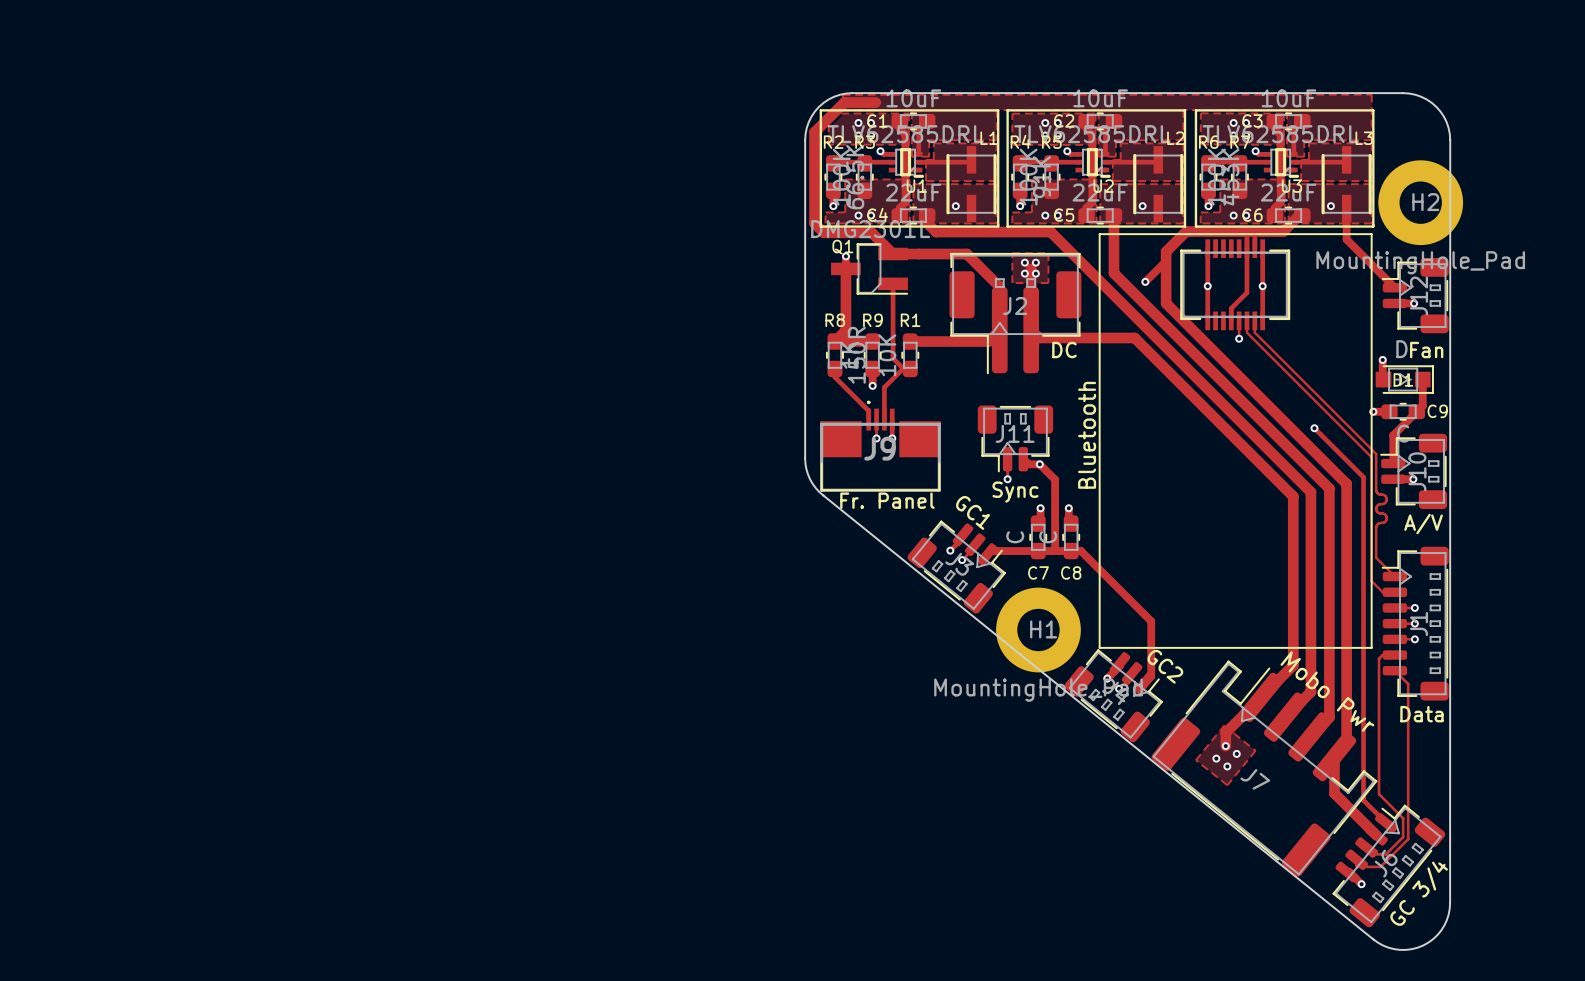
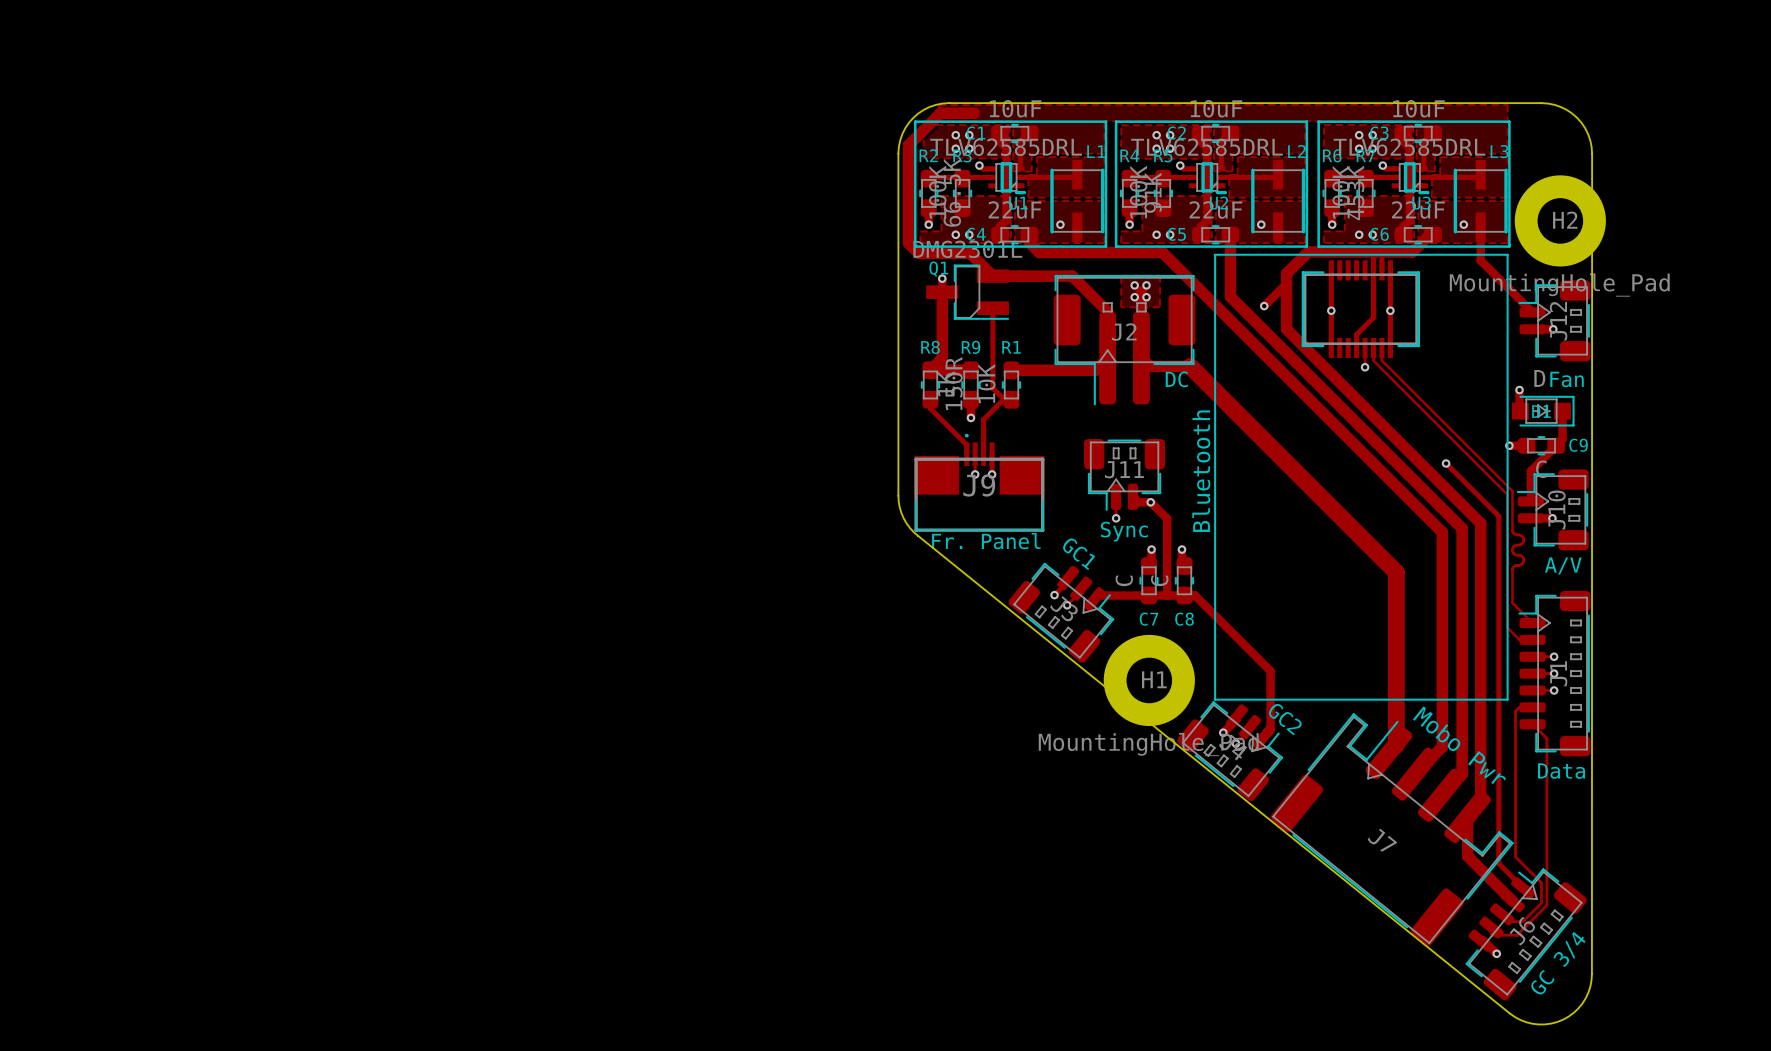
track: (1076, 337) (1134, 337) (1293, 496) (1293, 665) (1268, 690) -> (1190, 366) (1396, 572) (1396, 745)
track: (1261, 697) (1225, 732) (1225, 746) -> none
zone outline: (1224, 725) (1195, 760) (1227, 785) (1255, 750) (1224, 725) -> none
via: (1225, 746) -> none
via: (1236, 753) -> none
via: (1216, 758) -> none
via: (1227, 766) -> none

